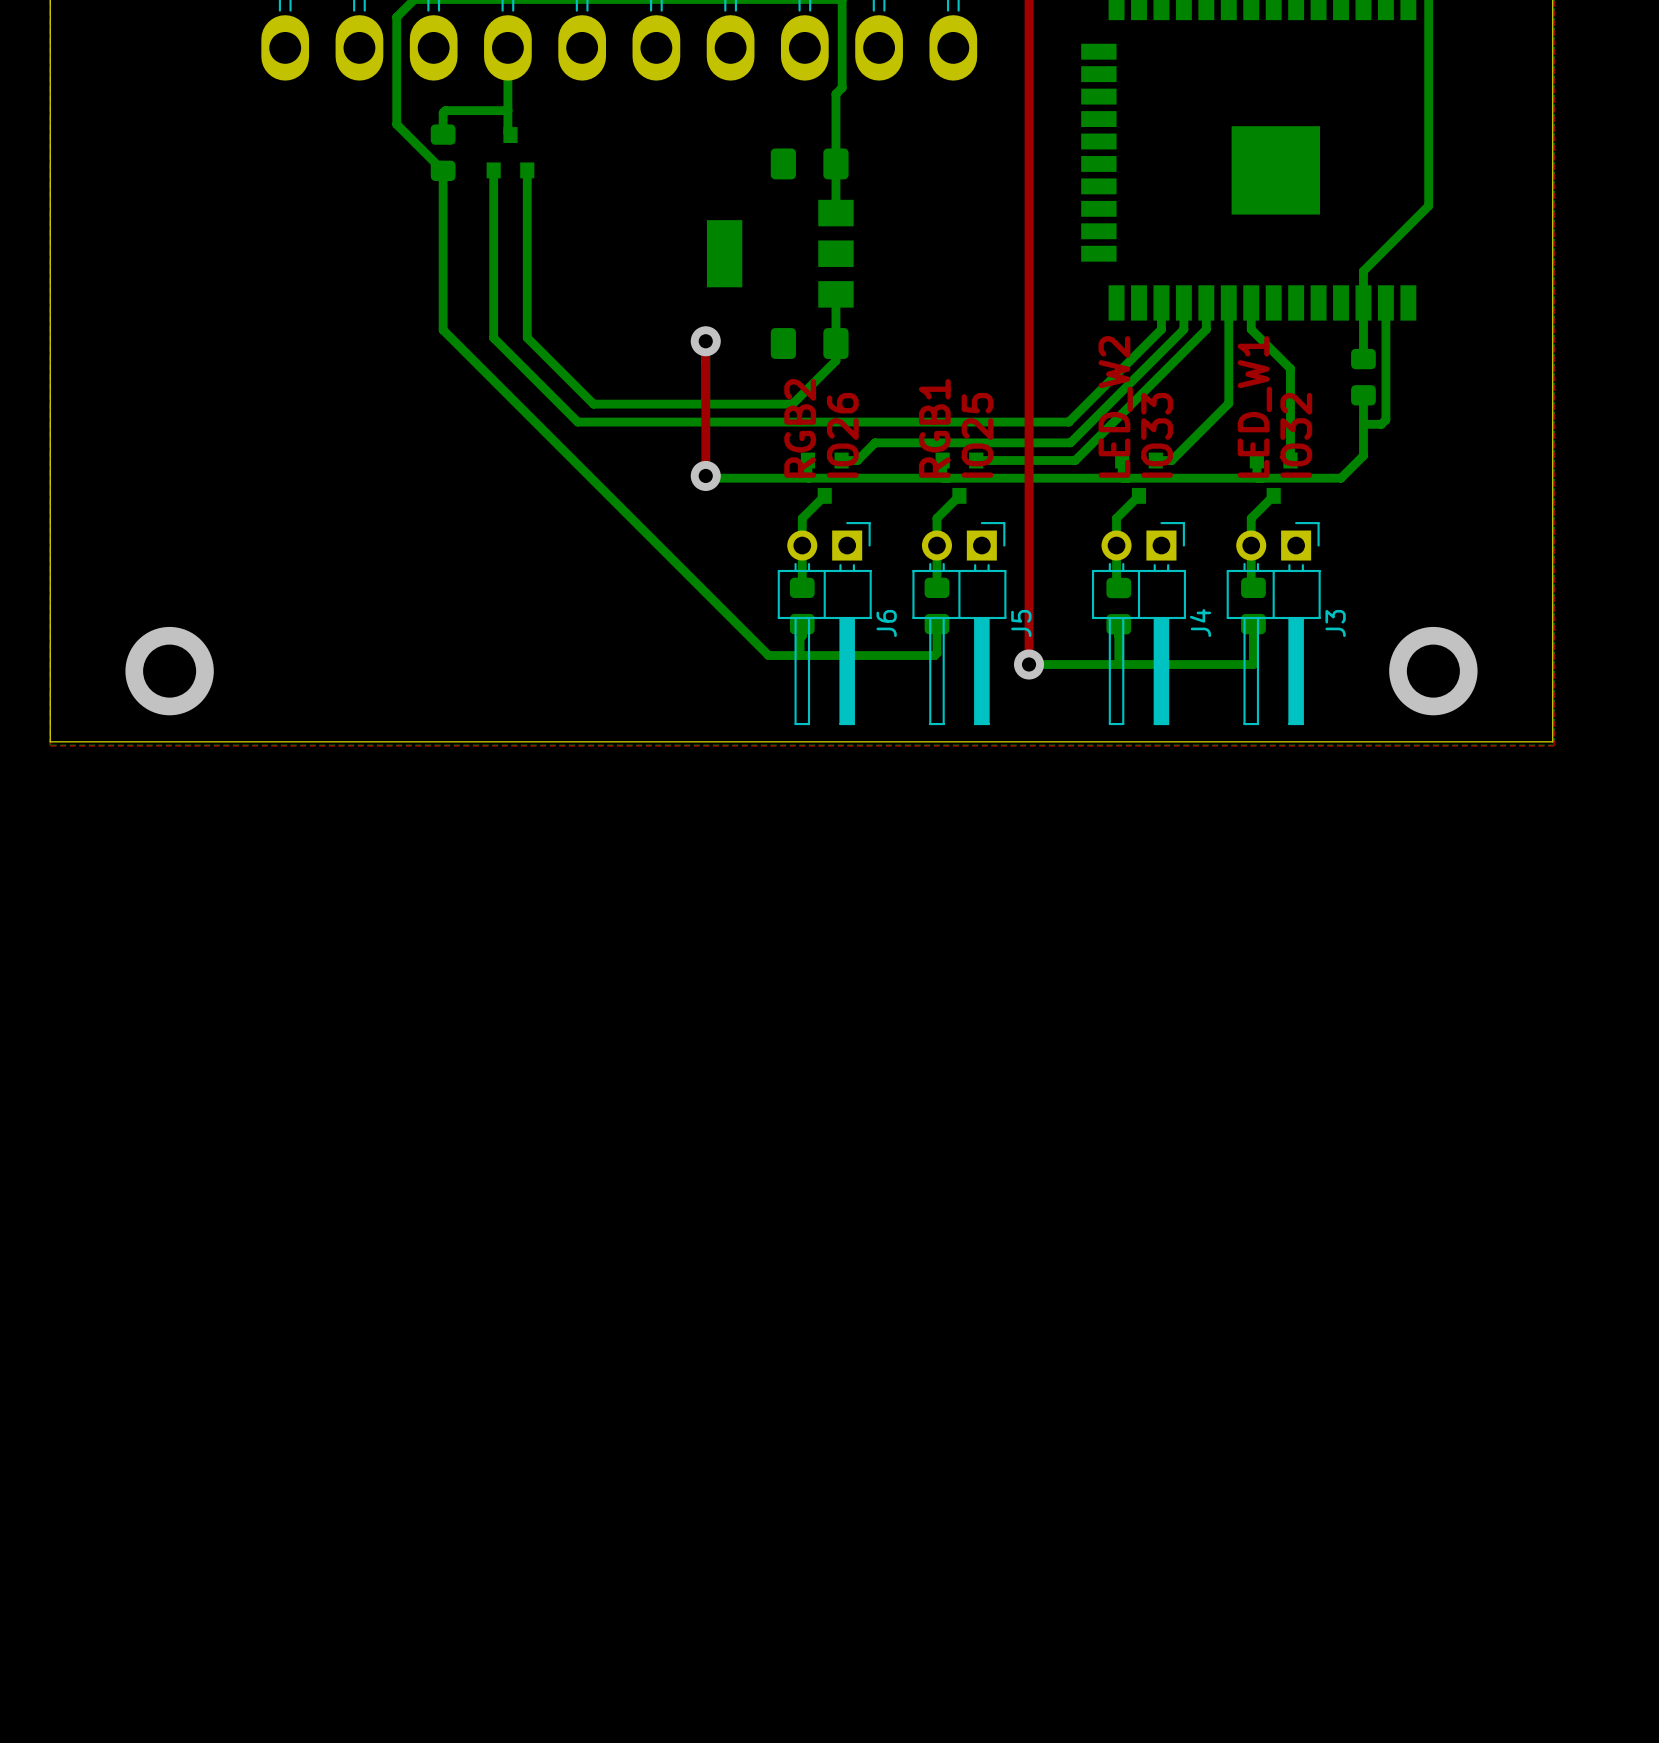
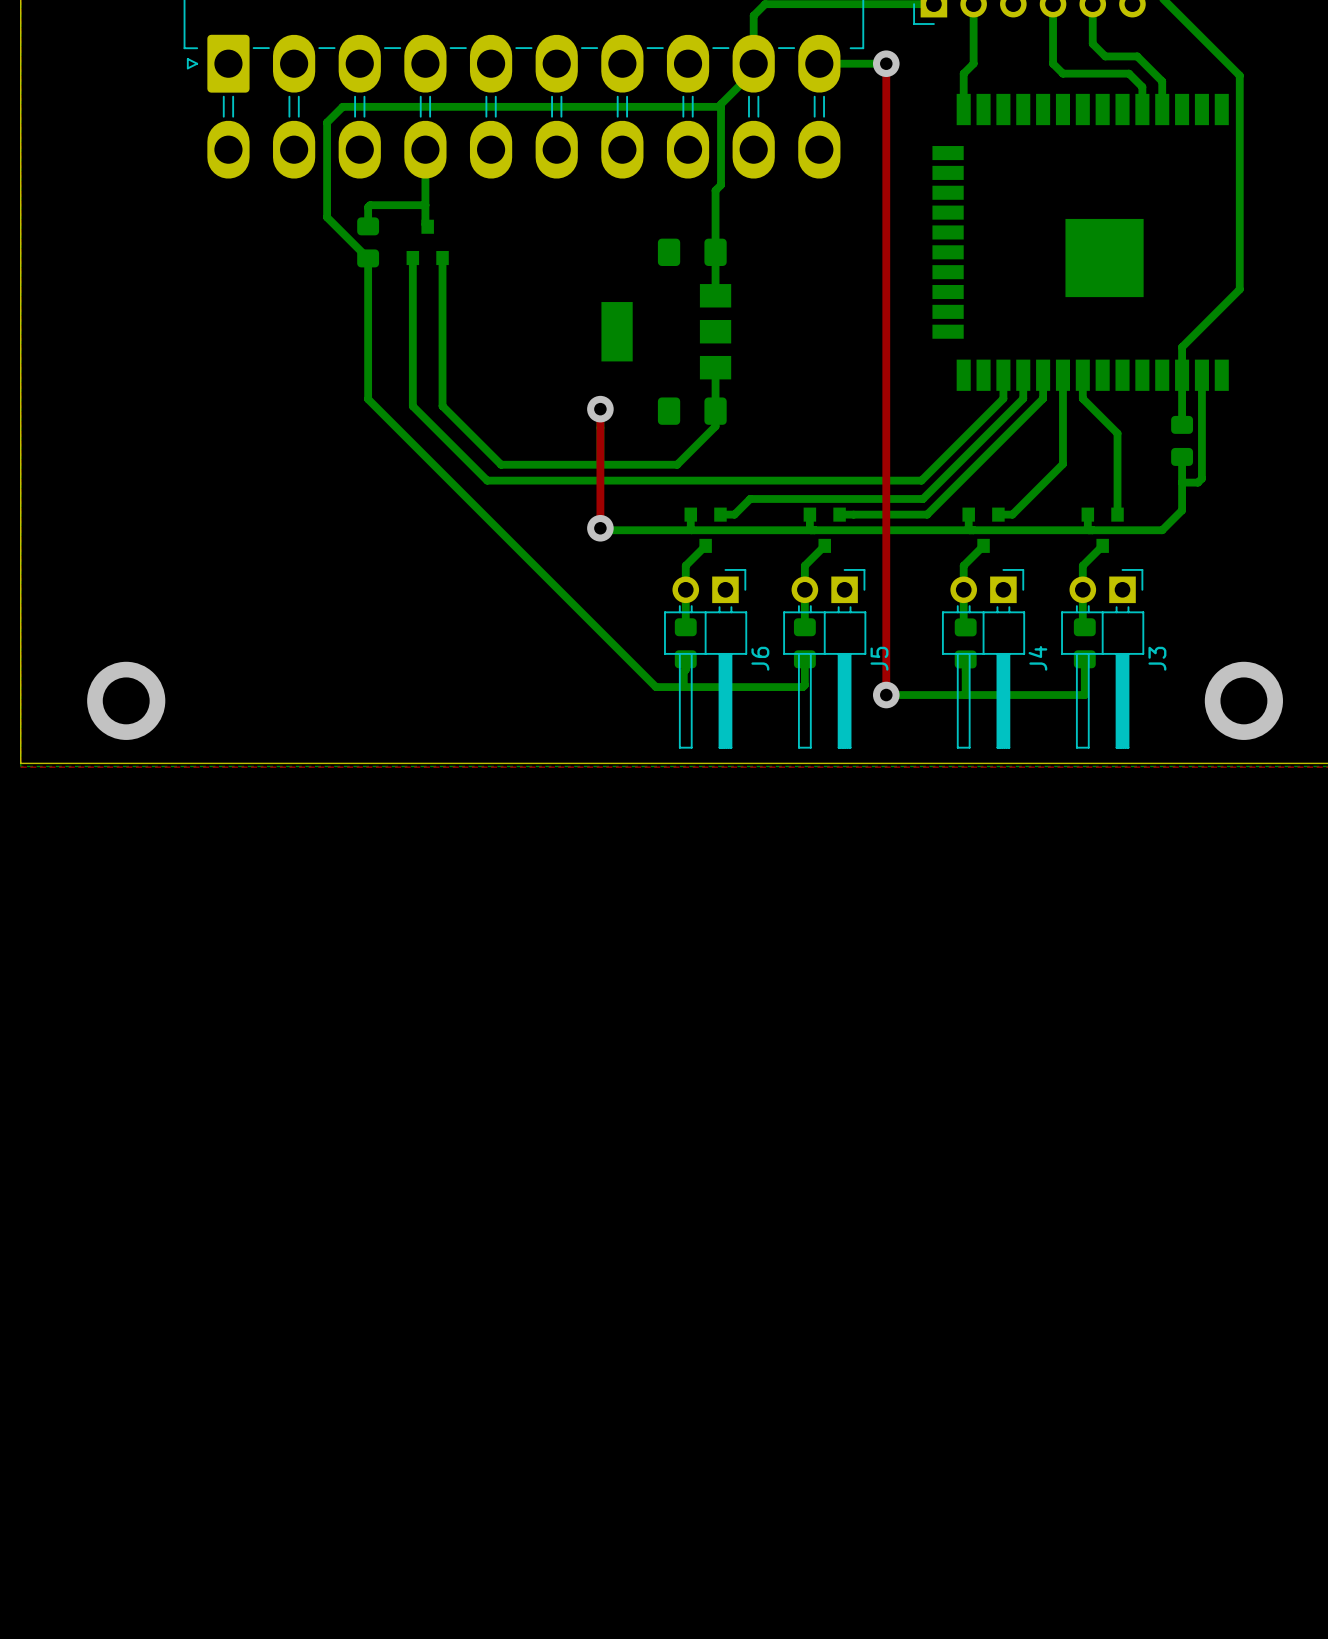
text: LED_W2 (1115, 406) -> none
text: LED_W1 (1254, 406) -> none
text: RGB2 (800, 428) -> none
text: RGB1 (934, 428) -> none
text: IO26 (842, 435) -> none
text: IO25 (977, 435) -> none
text: IO33 (1157, 435) -> none
text: IO32 (1296, 435) -> none

